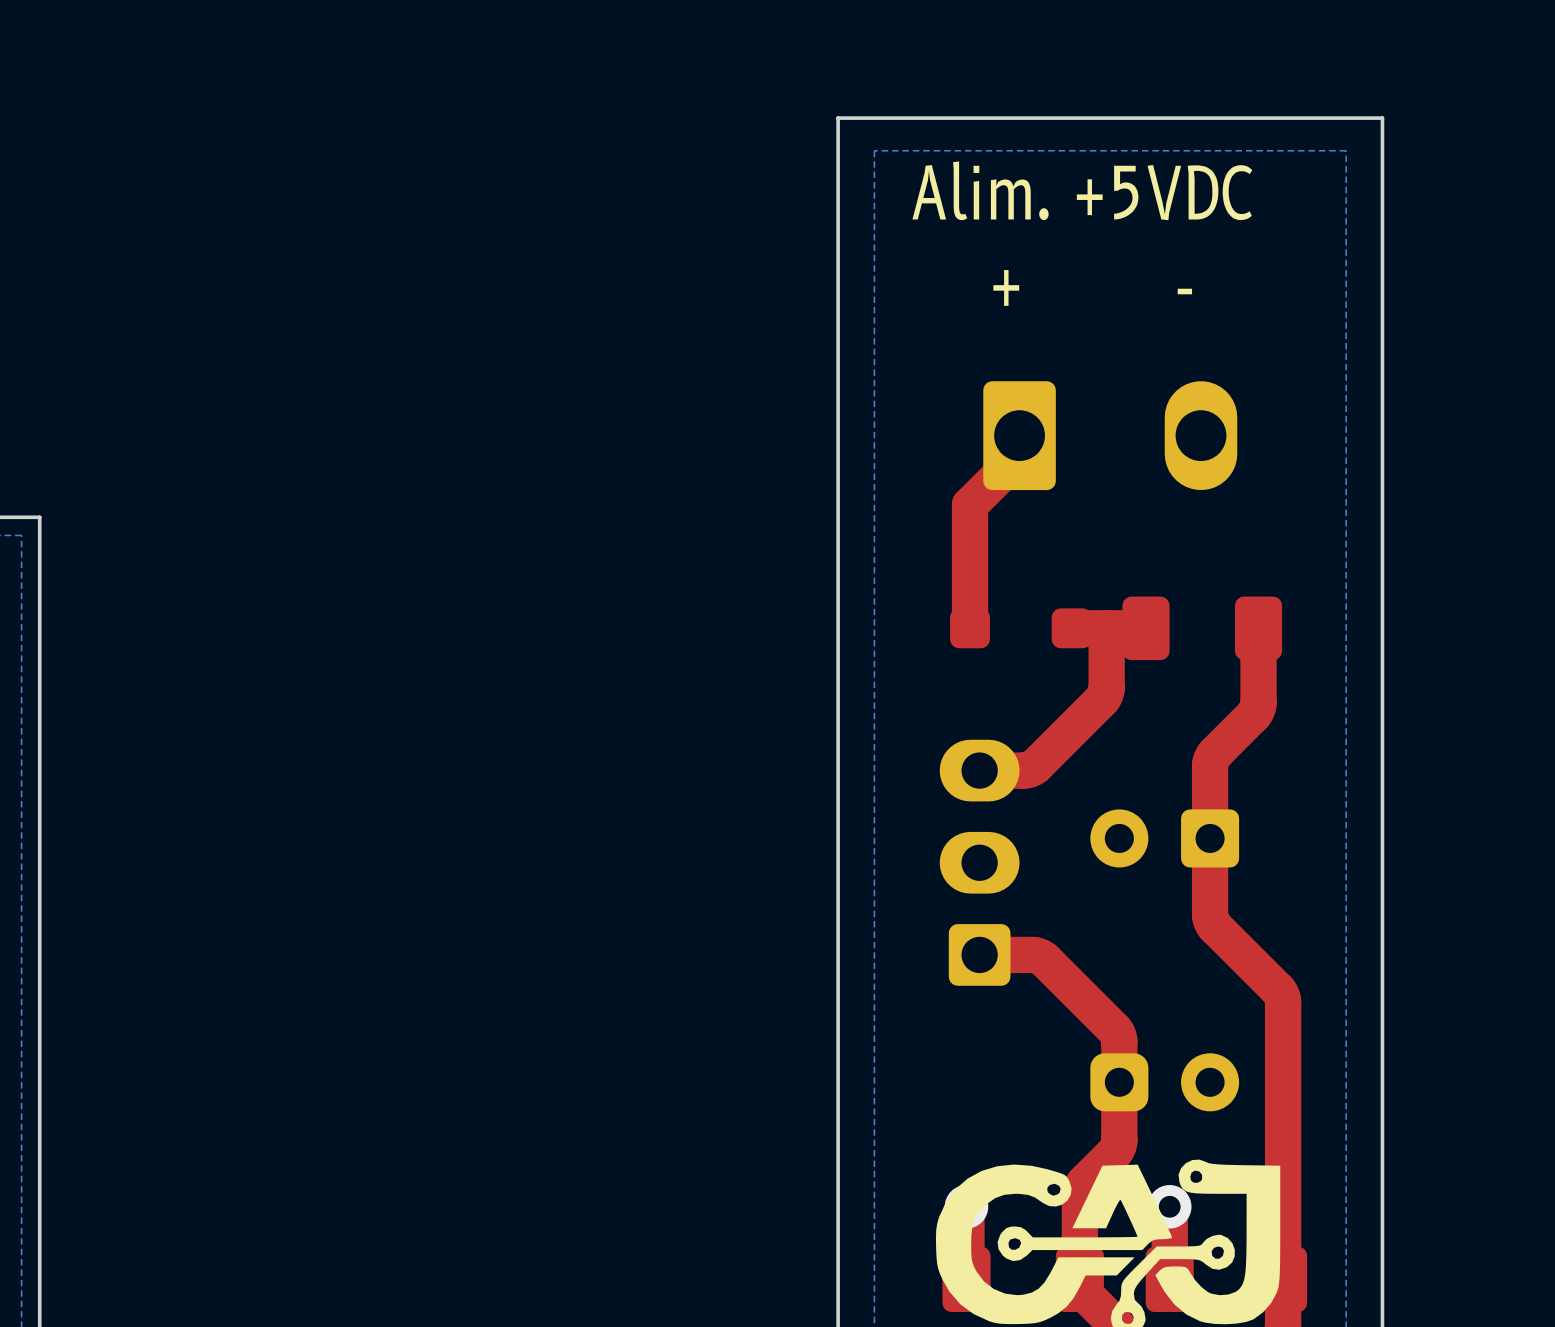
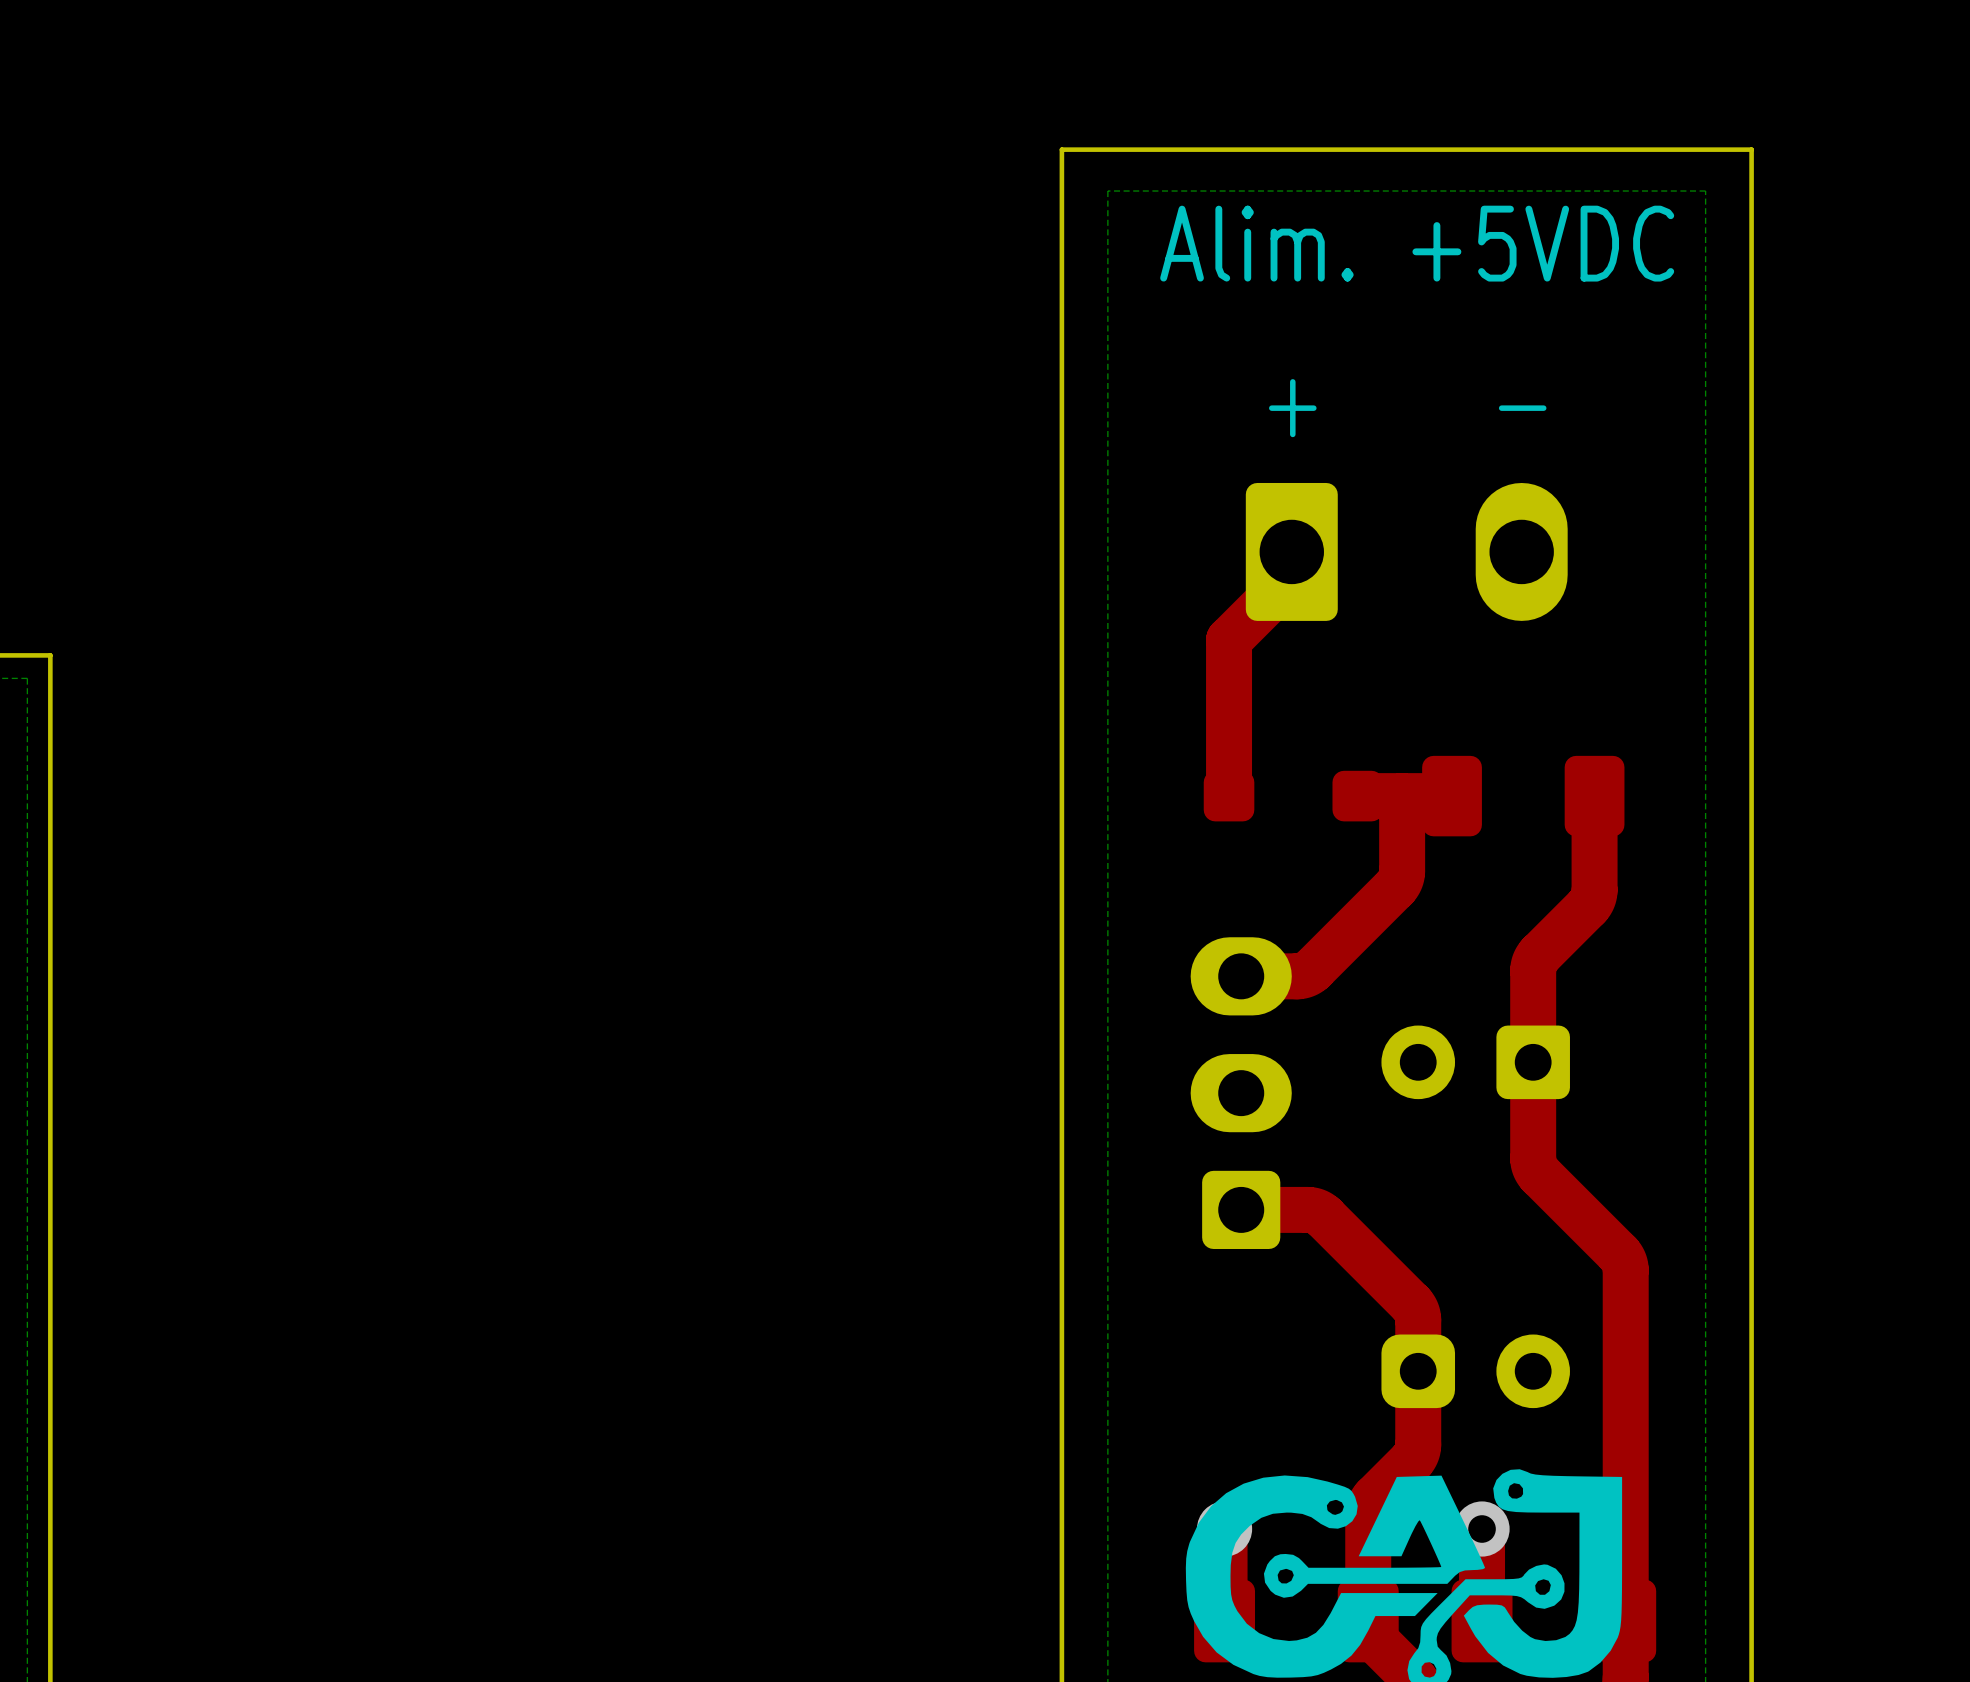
text position: + (1006, 287) -> + (1292, 408)
text position: - (1184, 291) -> - (1522, 408)

